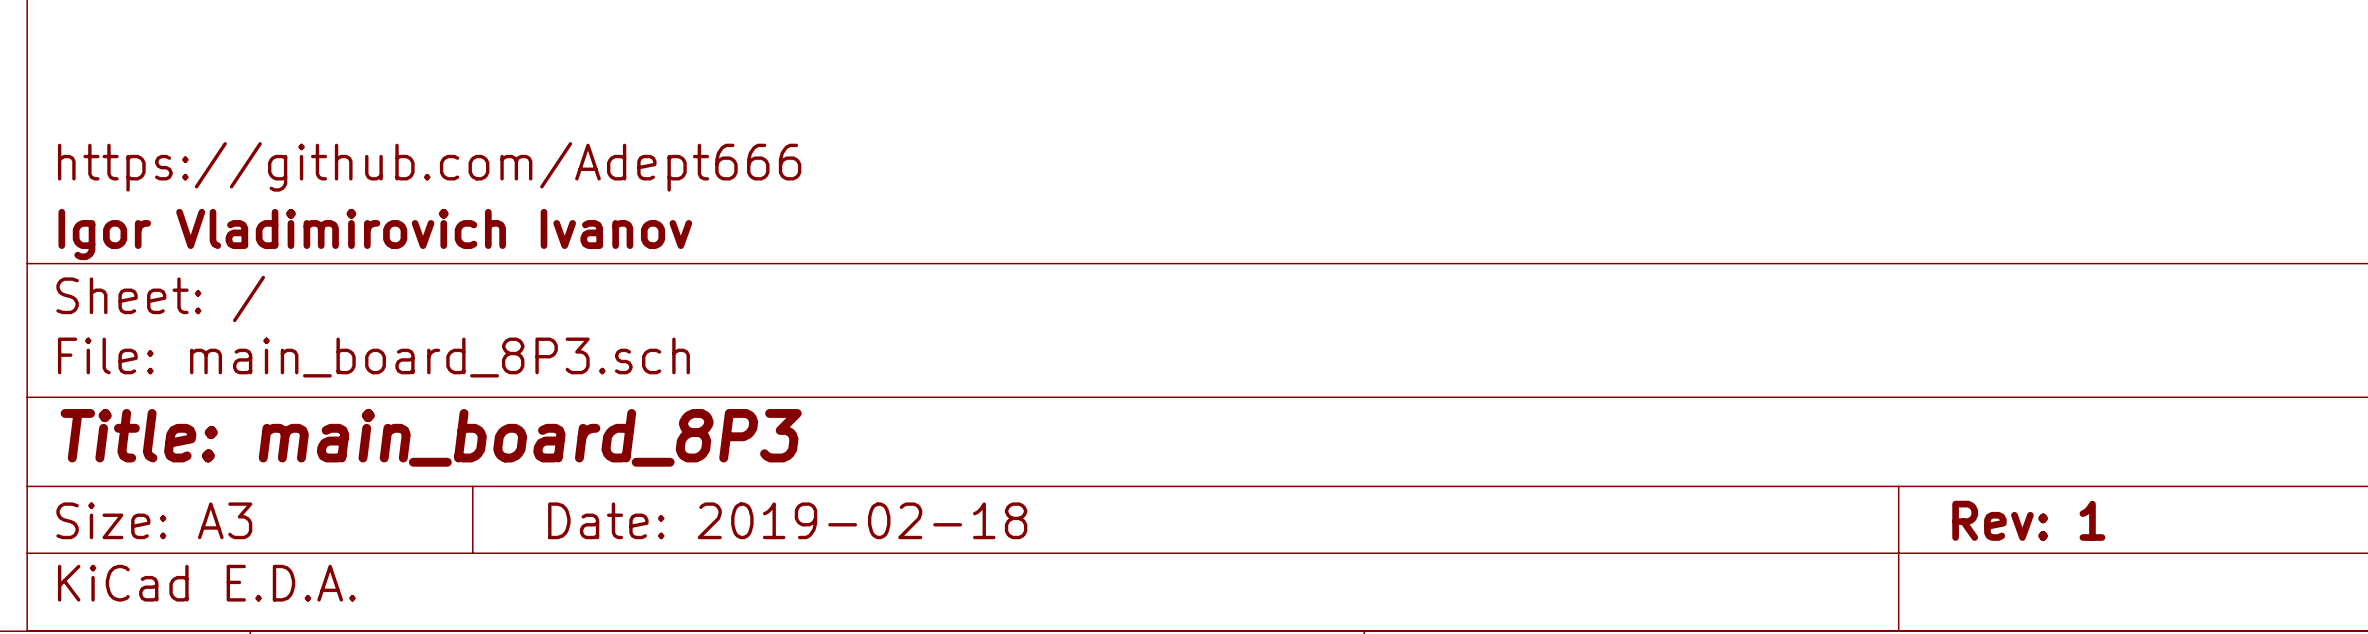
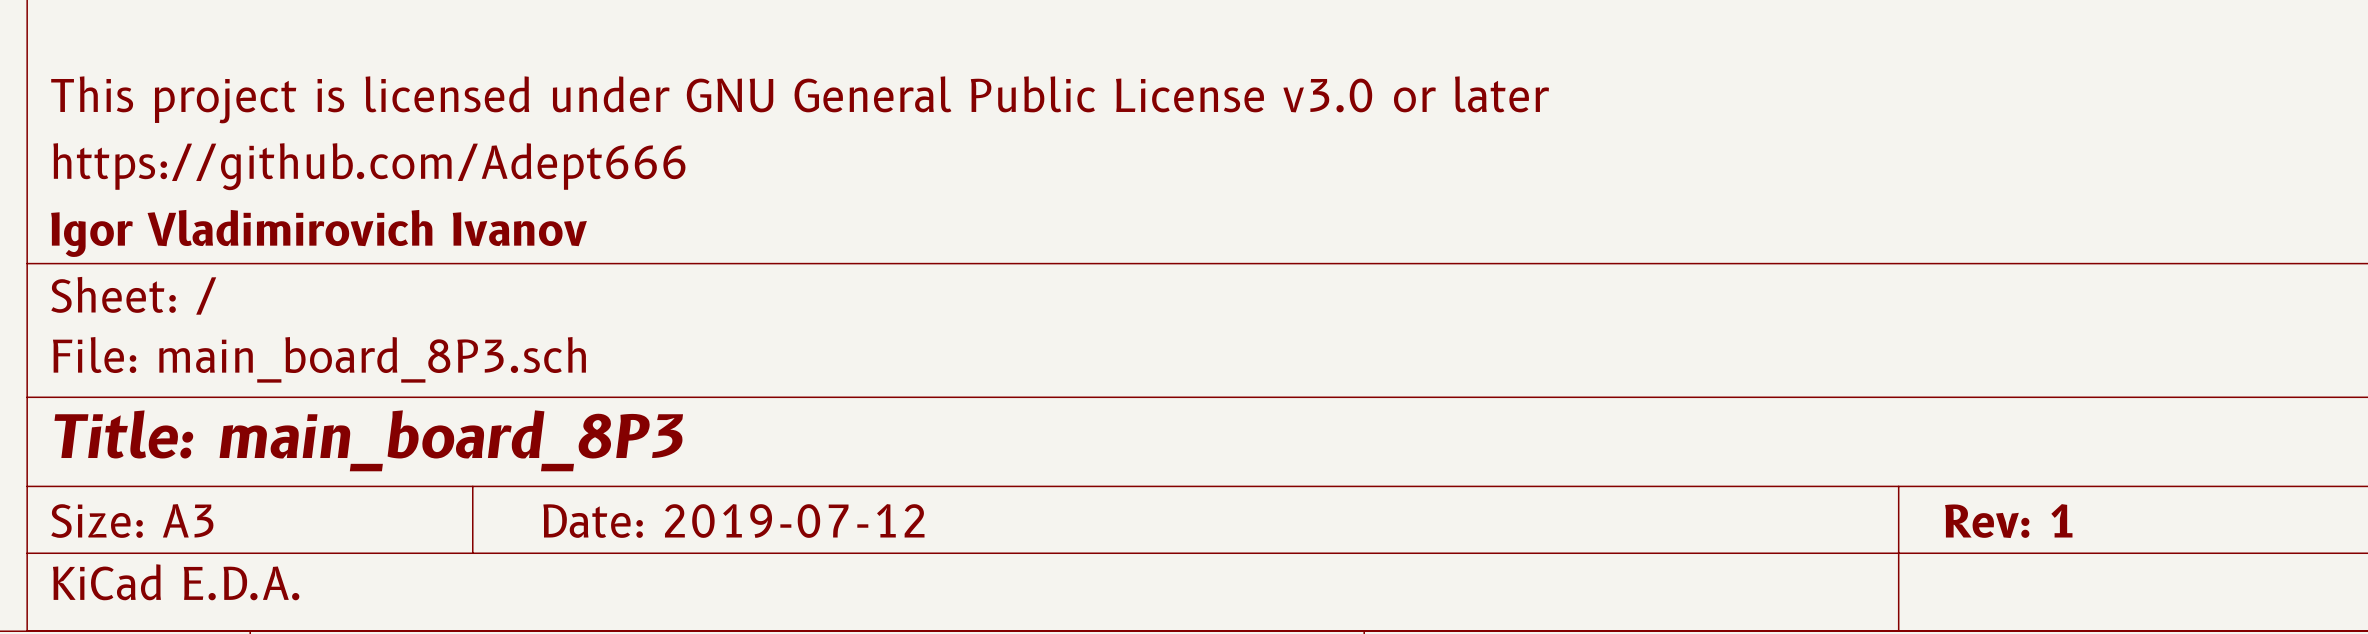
title block: none -> This project is licensed under GNU General Public License v3.0 or later (800, 99)
title block: Date: 2019-02-18 (787, 520) -> Date: 2019-07-12 (733, 520)

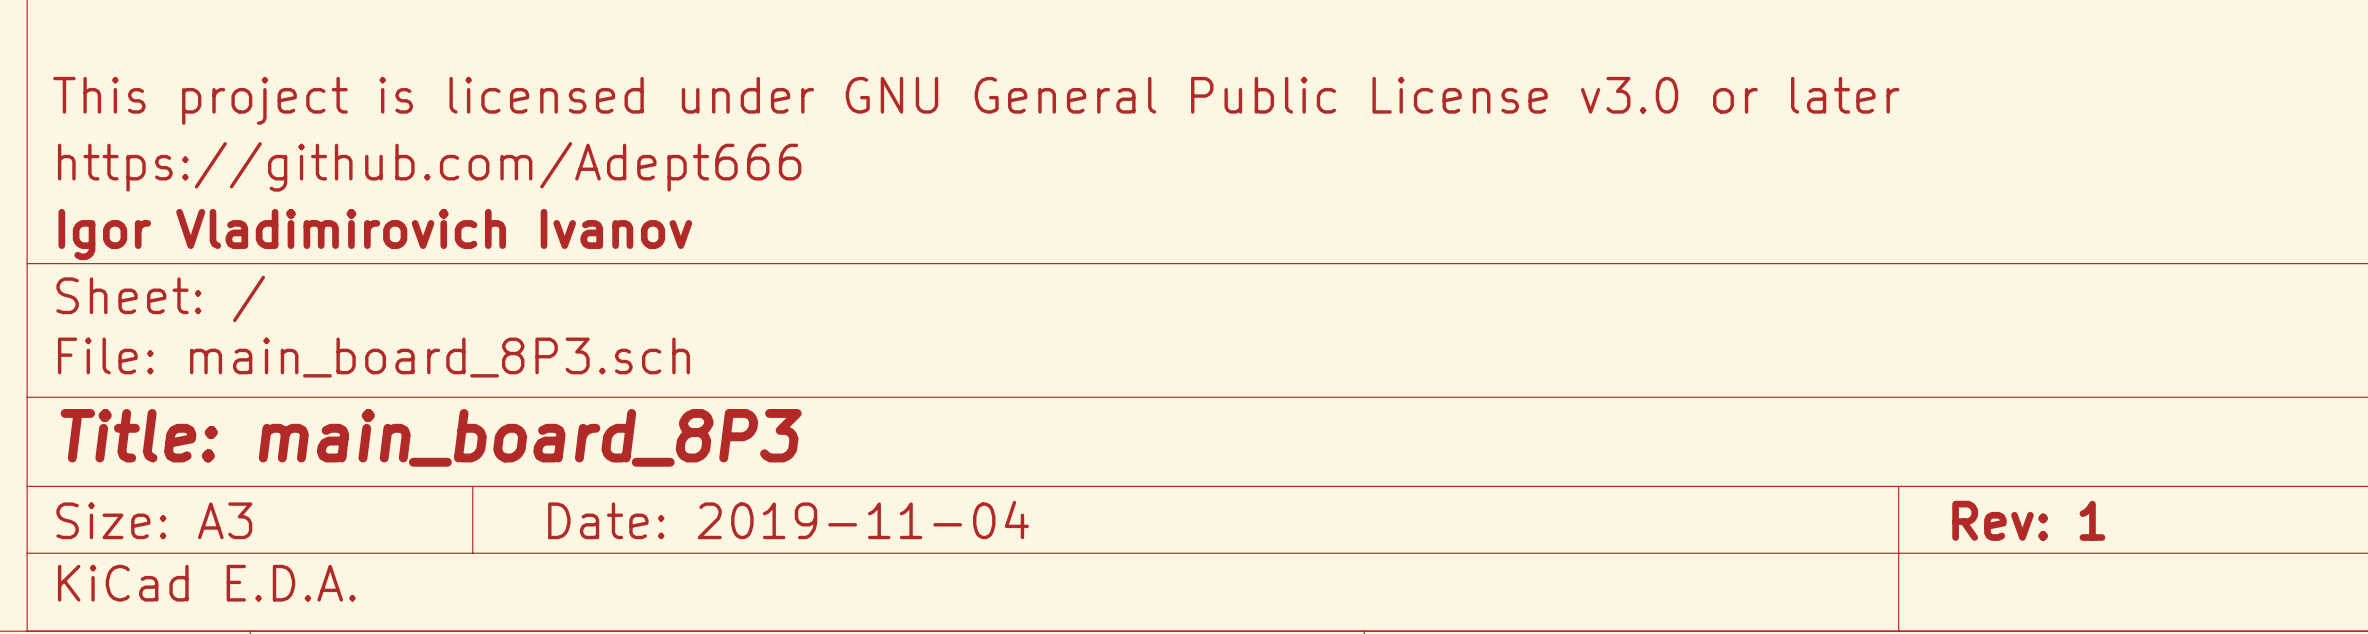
title block: Date: 2019-07-12 (733, 520) -> Date: 2019-11-04 (788, 520)

